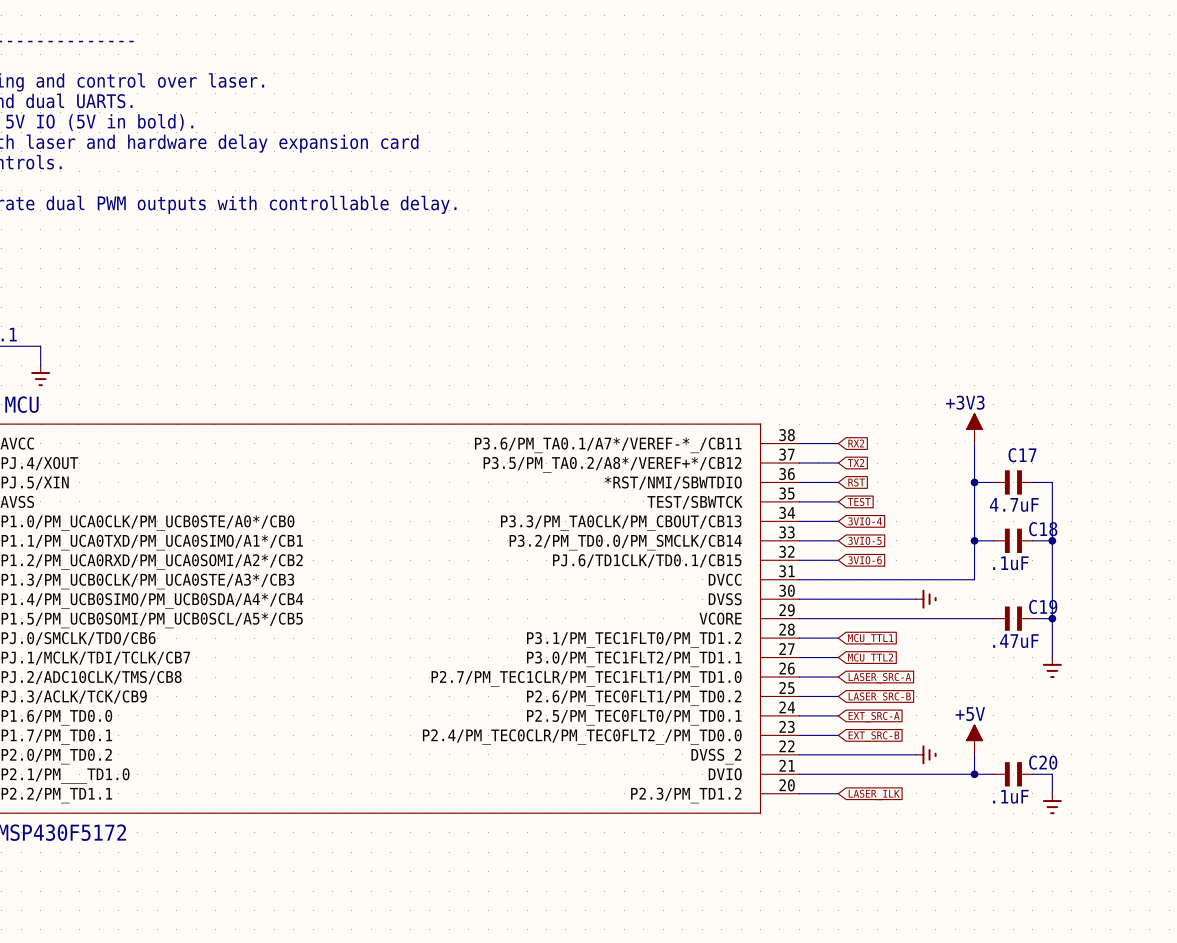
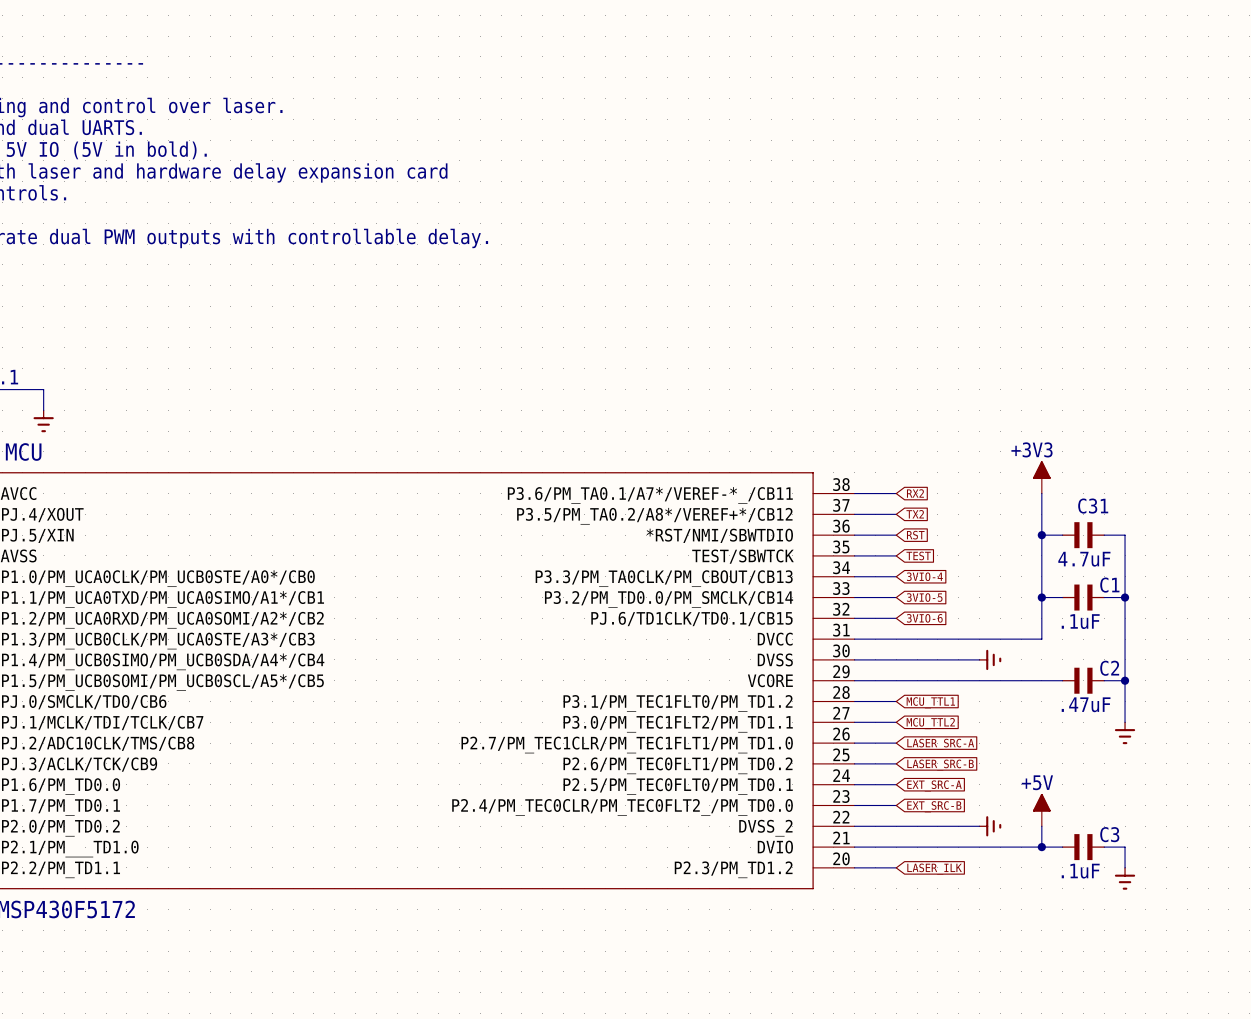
C17 name: C17 (1022, 455) -> C31 (1093, 506)
C18 name: C18 (1043, 529) -> C1 (1109, 585)
C19 name: C19 (1043, 606) -> C2 (1109, 668)
C20 name: C20 (1043, 762) -> C3 (1109, 834)

